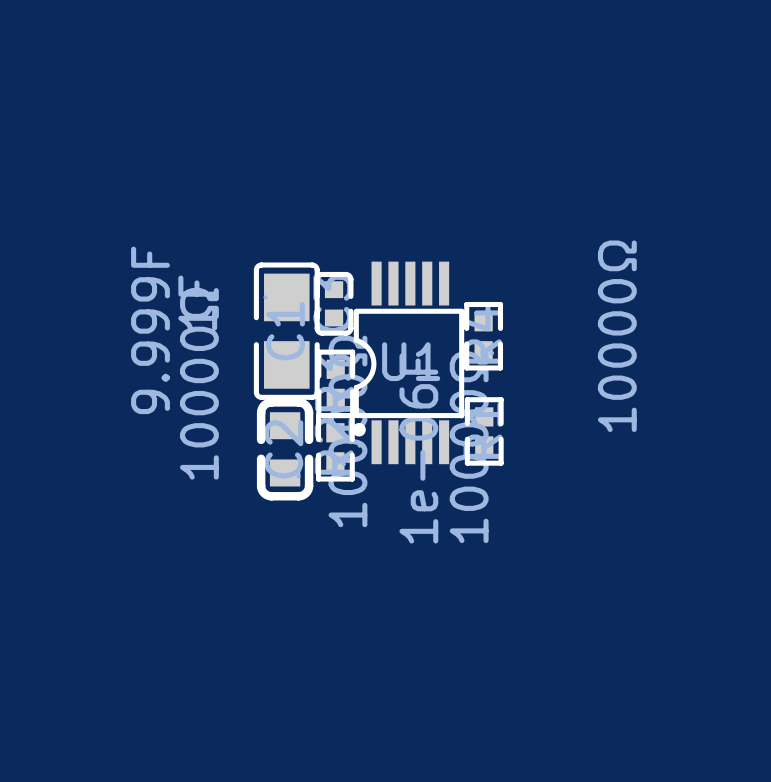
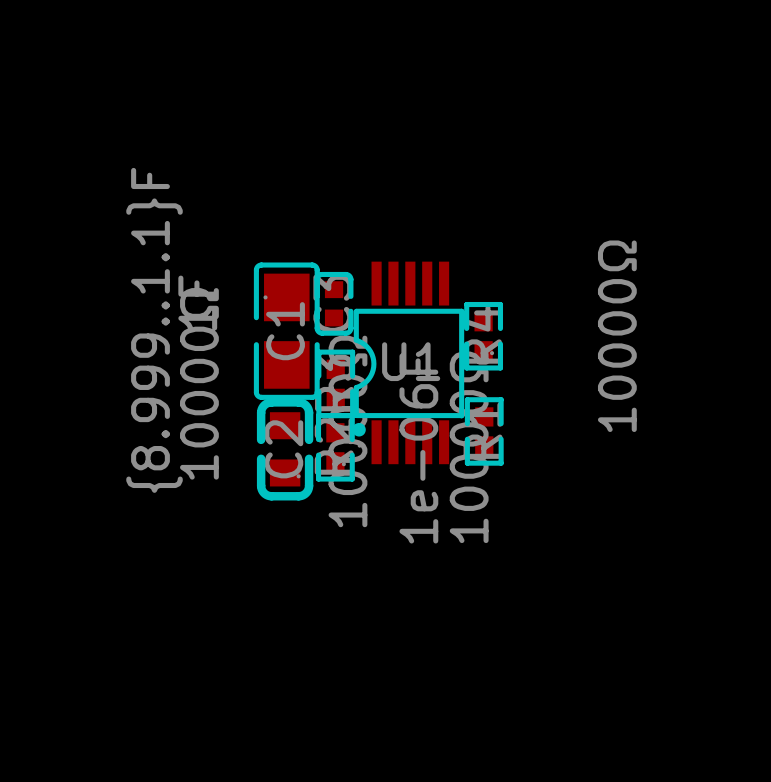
C1 value: 9.999F (150, 330) -> {8.999..1.1}F (154, 330)

